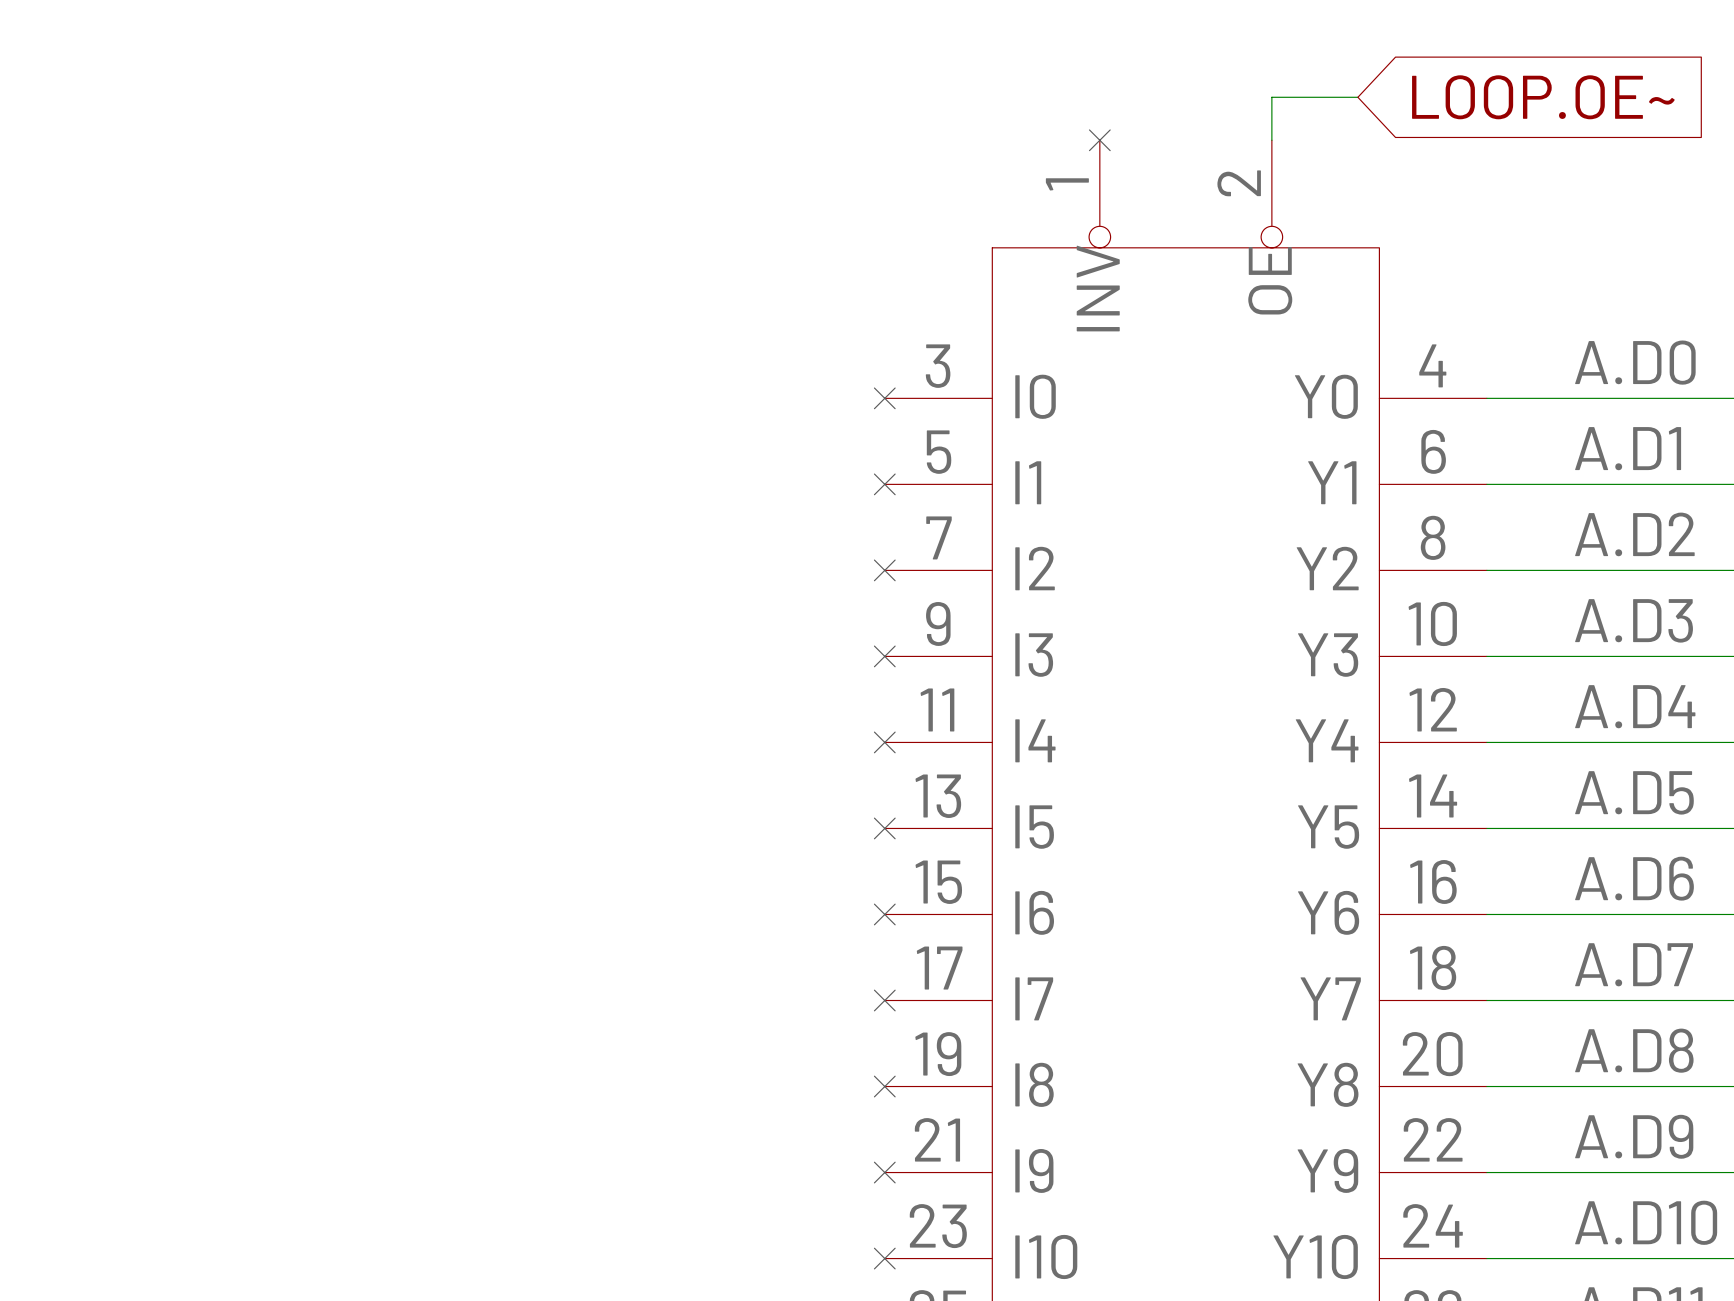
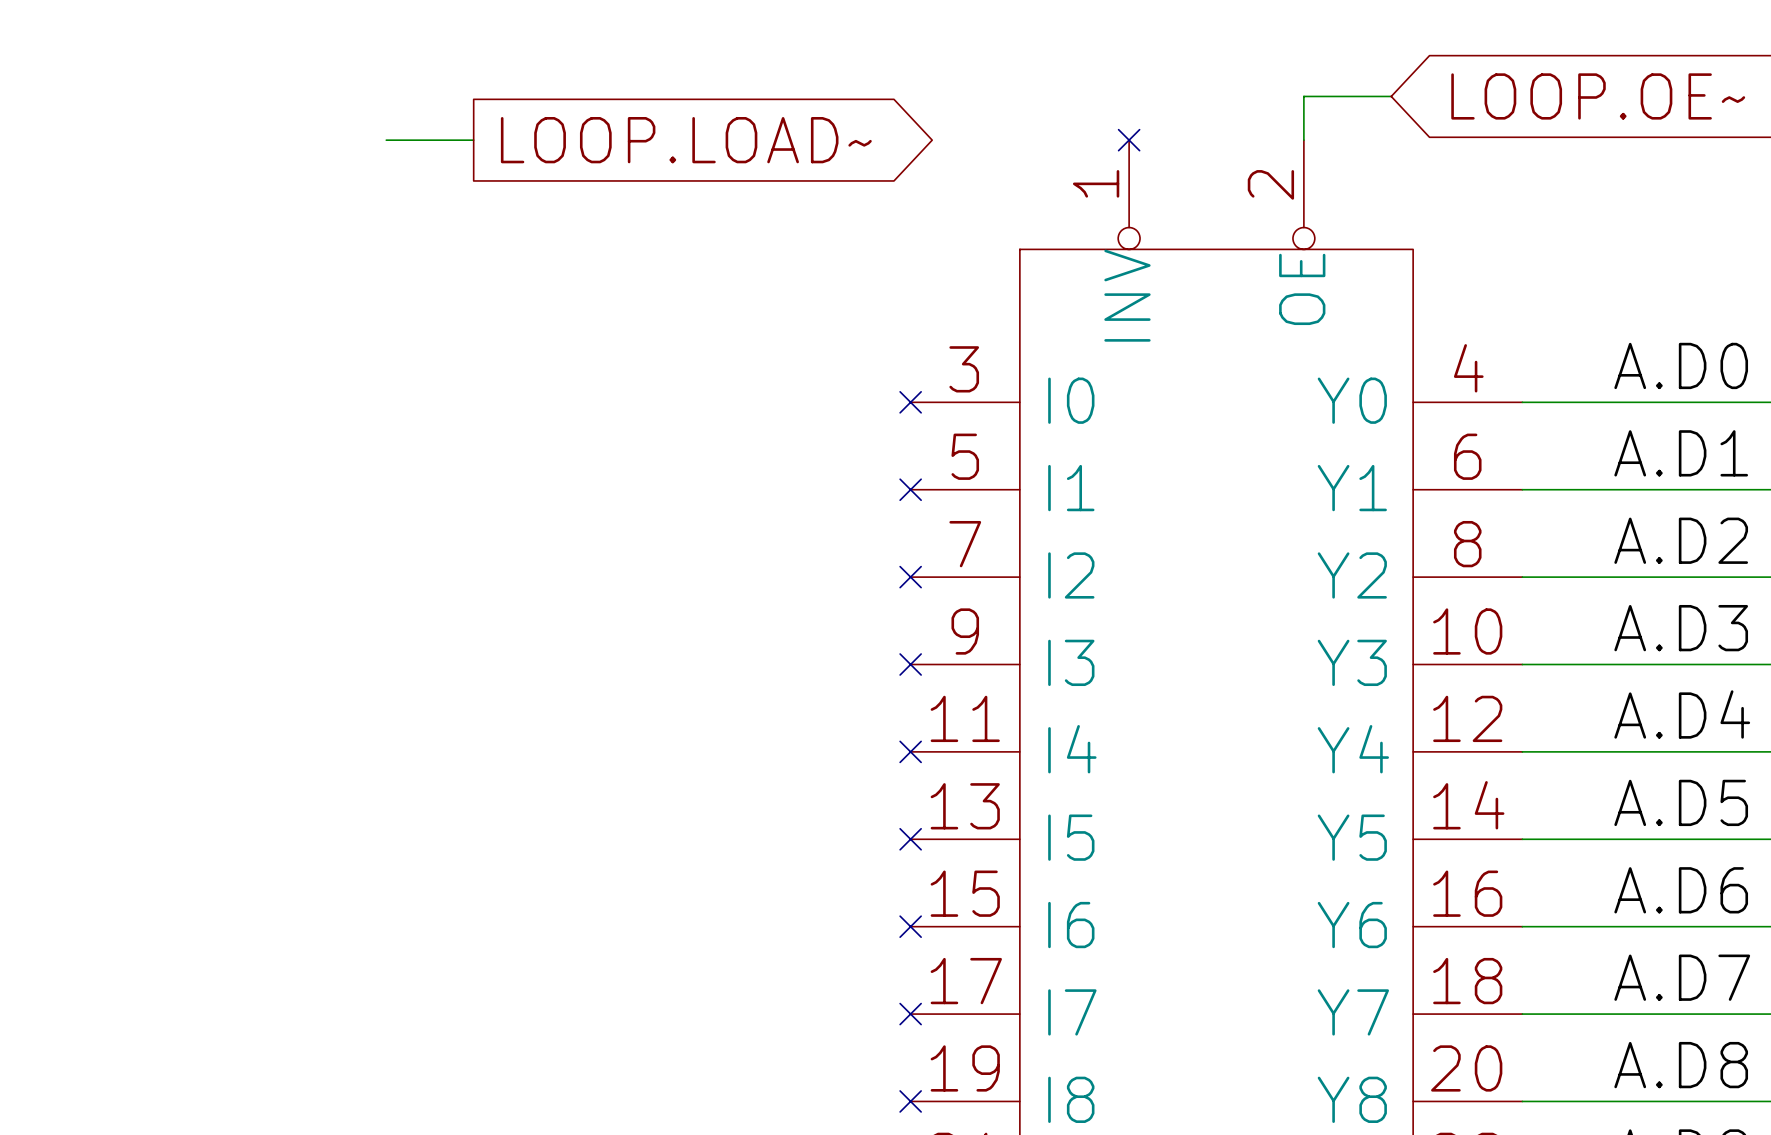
wire: none -> (386, 140) (473, 140)
global label: none -> LOOP.LOAD~ (686, 140)

